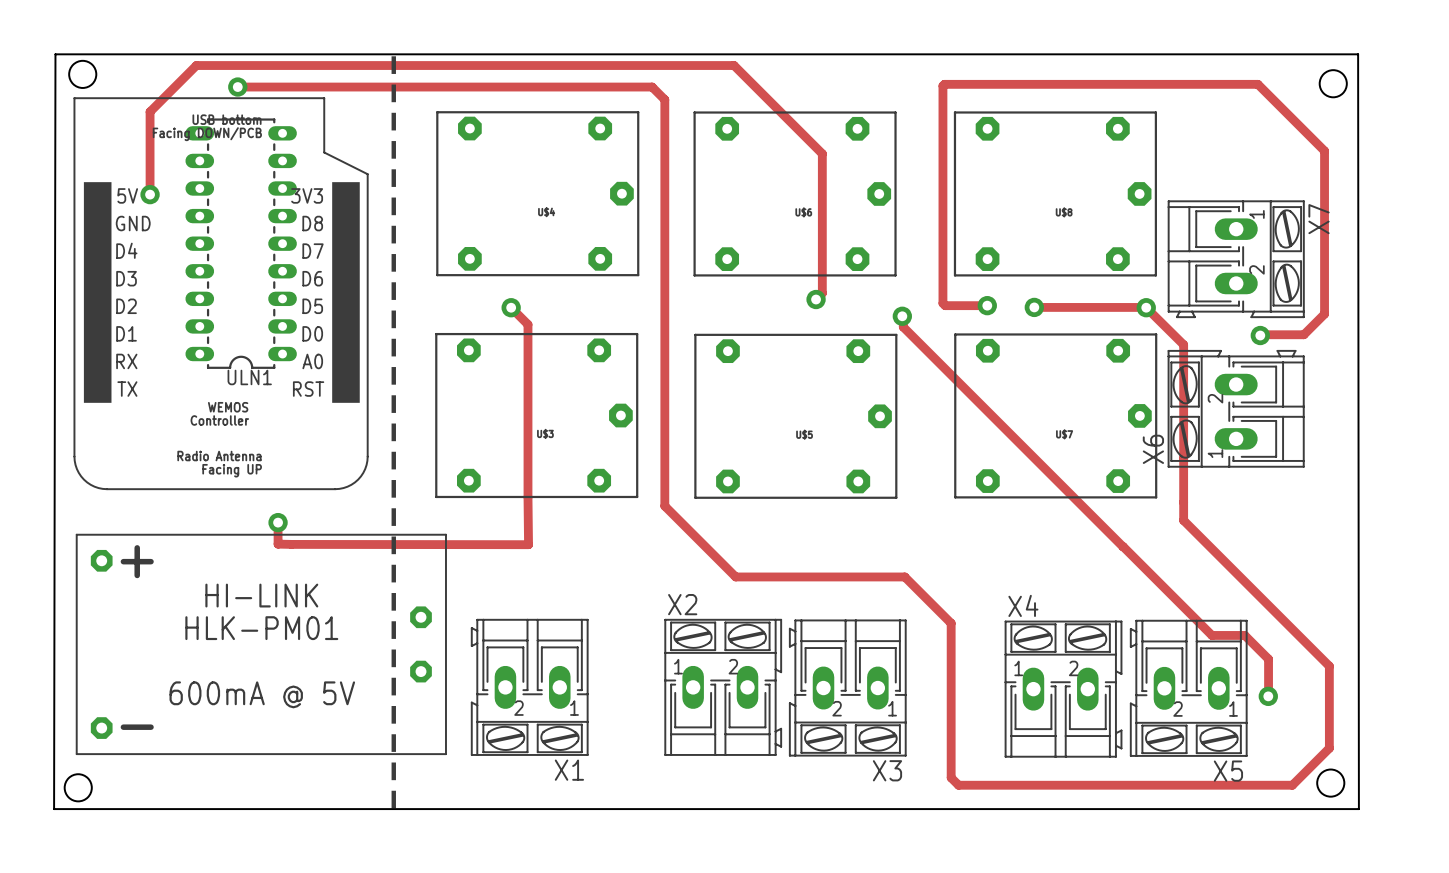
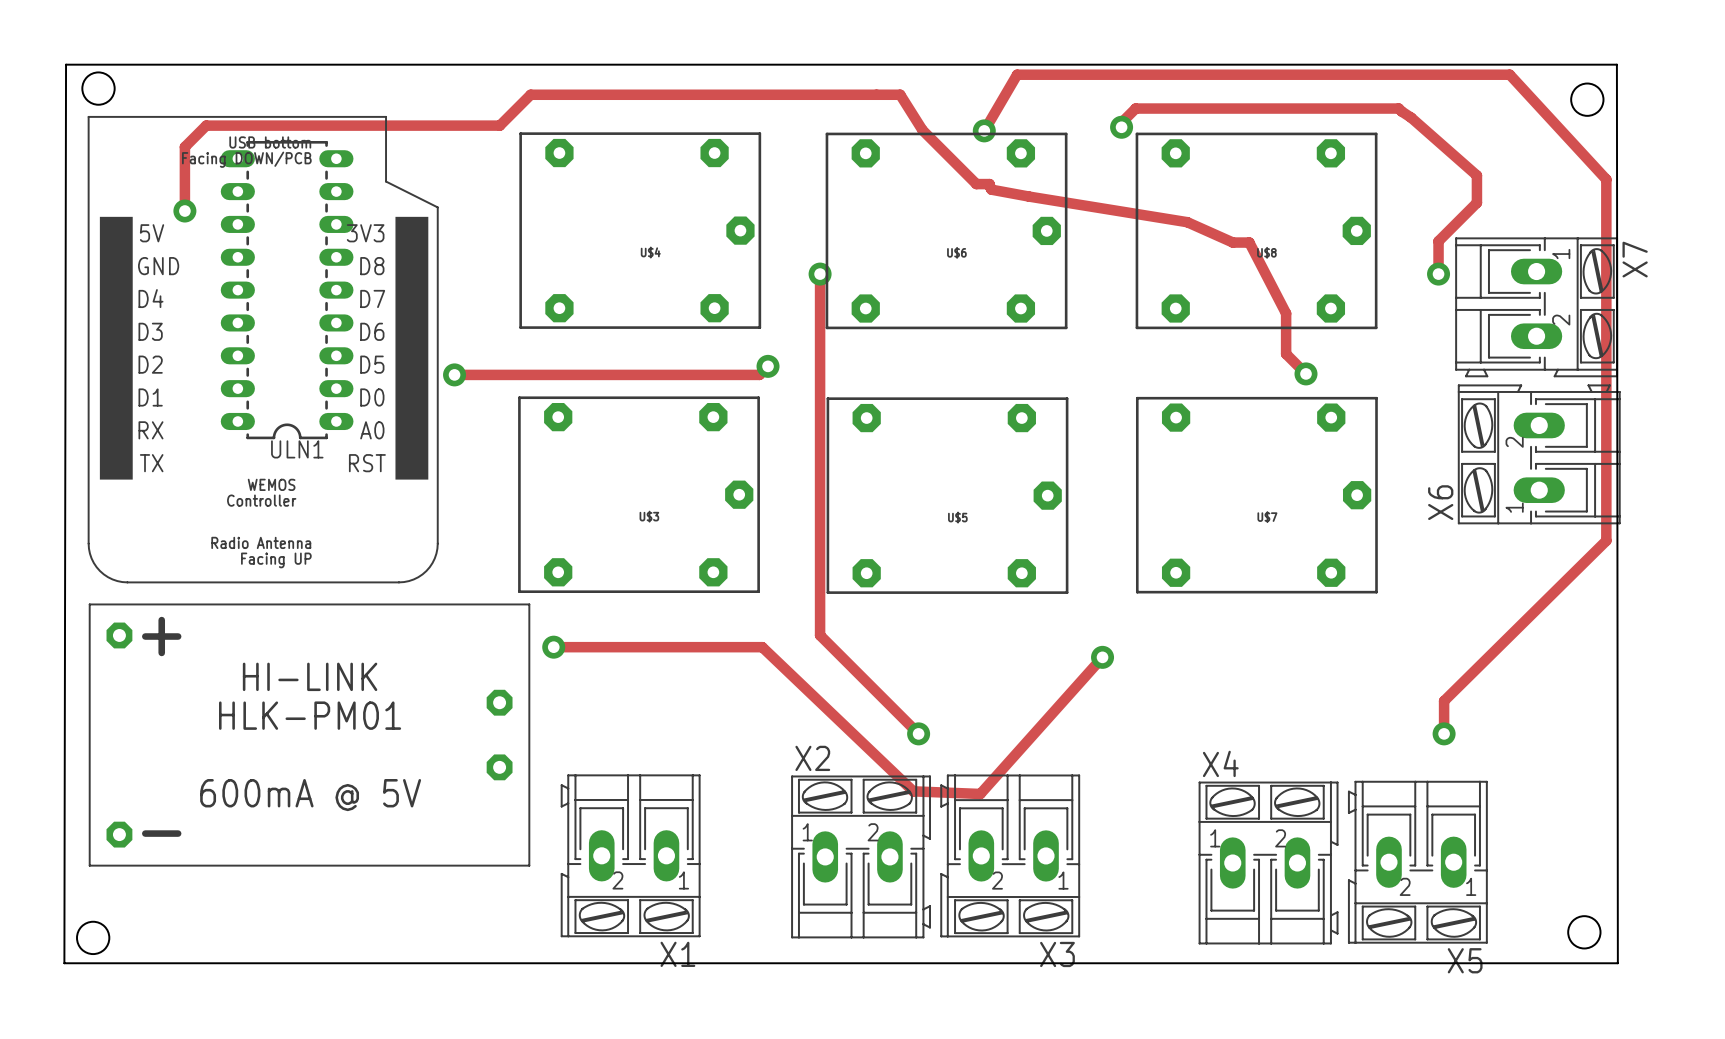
line: (393, 56) (393, 811) -> none
track: (237, 87) (652, 87) (664, 99) (664, 506) (735, 576) (904, 576) (951, 623) (951, 777) (958, 785) (1292, 785) (1329, 748) (1329, 666) (1183, 520) (1183, 344) (1146, 307) (1034, 307) -> none
via: (237, 87) -> none
track: none -> (1121, 127) (1121, 122) (1135, 108) (1398, 108) (1476, 175) (1476, 202) (1438, 241) (1438, 274)
via: none -> (1121, 127)
track: none -> (984, 130) (1017, 74) (1509, 74) (1606, 179) (1606, 540) (1444, 701) (1444, 733)
via: none -> (984, 130)
track: none -> (184, 211) (184, 146) (206, 125) (499, 125) (530, 94) (900, 94) (922, 130) (976, 184) (989, 184) (991, 189) (1028, 196) (1187, 222) (1232, 242) (1249, 242) (1286, 313) (1286, 354) (1306, 373)
track: (150, 194) (150, 111) (196, 65) (734, 65) (822, 153) (822, 293) (816, 299) -> none
via position: (150, 194) -> (184, 211)
track: none -> (820, 274) (820, 635) (918, 733)
via: none -> (820, 274)
via: none -> (1438, 274)
X7 position: (1236, 259) -> (1536, 307)
via: (816, 299) -> none
track: (987, 305) (945, 305) (942, 303) (942, 85) (944, 84) (1257, 84) (1324, 150) (1324, 314) (1303, 334) (1260, 335) -> none
via: (987, 305) -> none
track: (511, 307) (527, 324) (528, 544) (278, 544) (278, 522) -> none
via: (511, 307) -> none
track: none -> (768, 366) (759, 374) (454, 374)
via: none -> (768, 366)
via: (1034, 307) -> none
via: (1146, 307) -> none
via: none -> (454, 374)
via: none -> (1306, 373)
track: (902, 316) (903, 327) (1211, 635) (1244, 635) (1268, 659) (1268, 696) -> none
via: (902, 316) -> none
via: (1260, 335) -> none
X6 position: (1236, 408) -> (1539, 454)
via: (278, 522) -> none
track: none -> (553, 647) (762, 647) (913, 791) (980, 793) (1102, 657)
via: none -> (553, 647)
via: none -> (1102, 657)
via: none -> (918, 733)
via: none -> (1444, 733)
part position: (261, 644) -> (309, 735)
X1 position: (529, 687) -> (630, 855)
X2 position: (723, 687) -> (861, 856)
X3 position: (847, 688) -> (1010, 855)
X5 position: (1188, 688) -> (1417, 862)
X4 position: (1063, 689) -> (1268, 862)
via: (1268, 696) -> none

